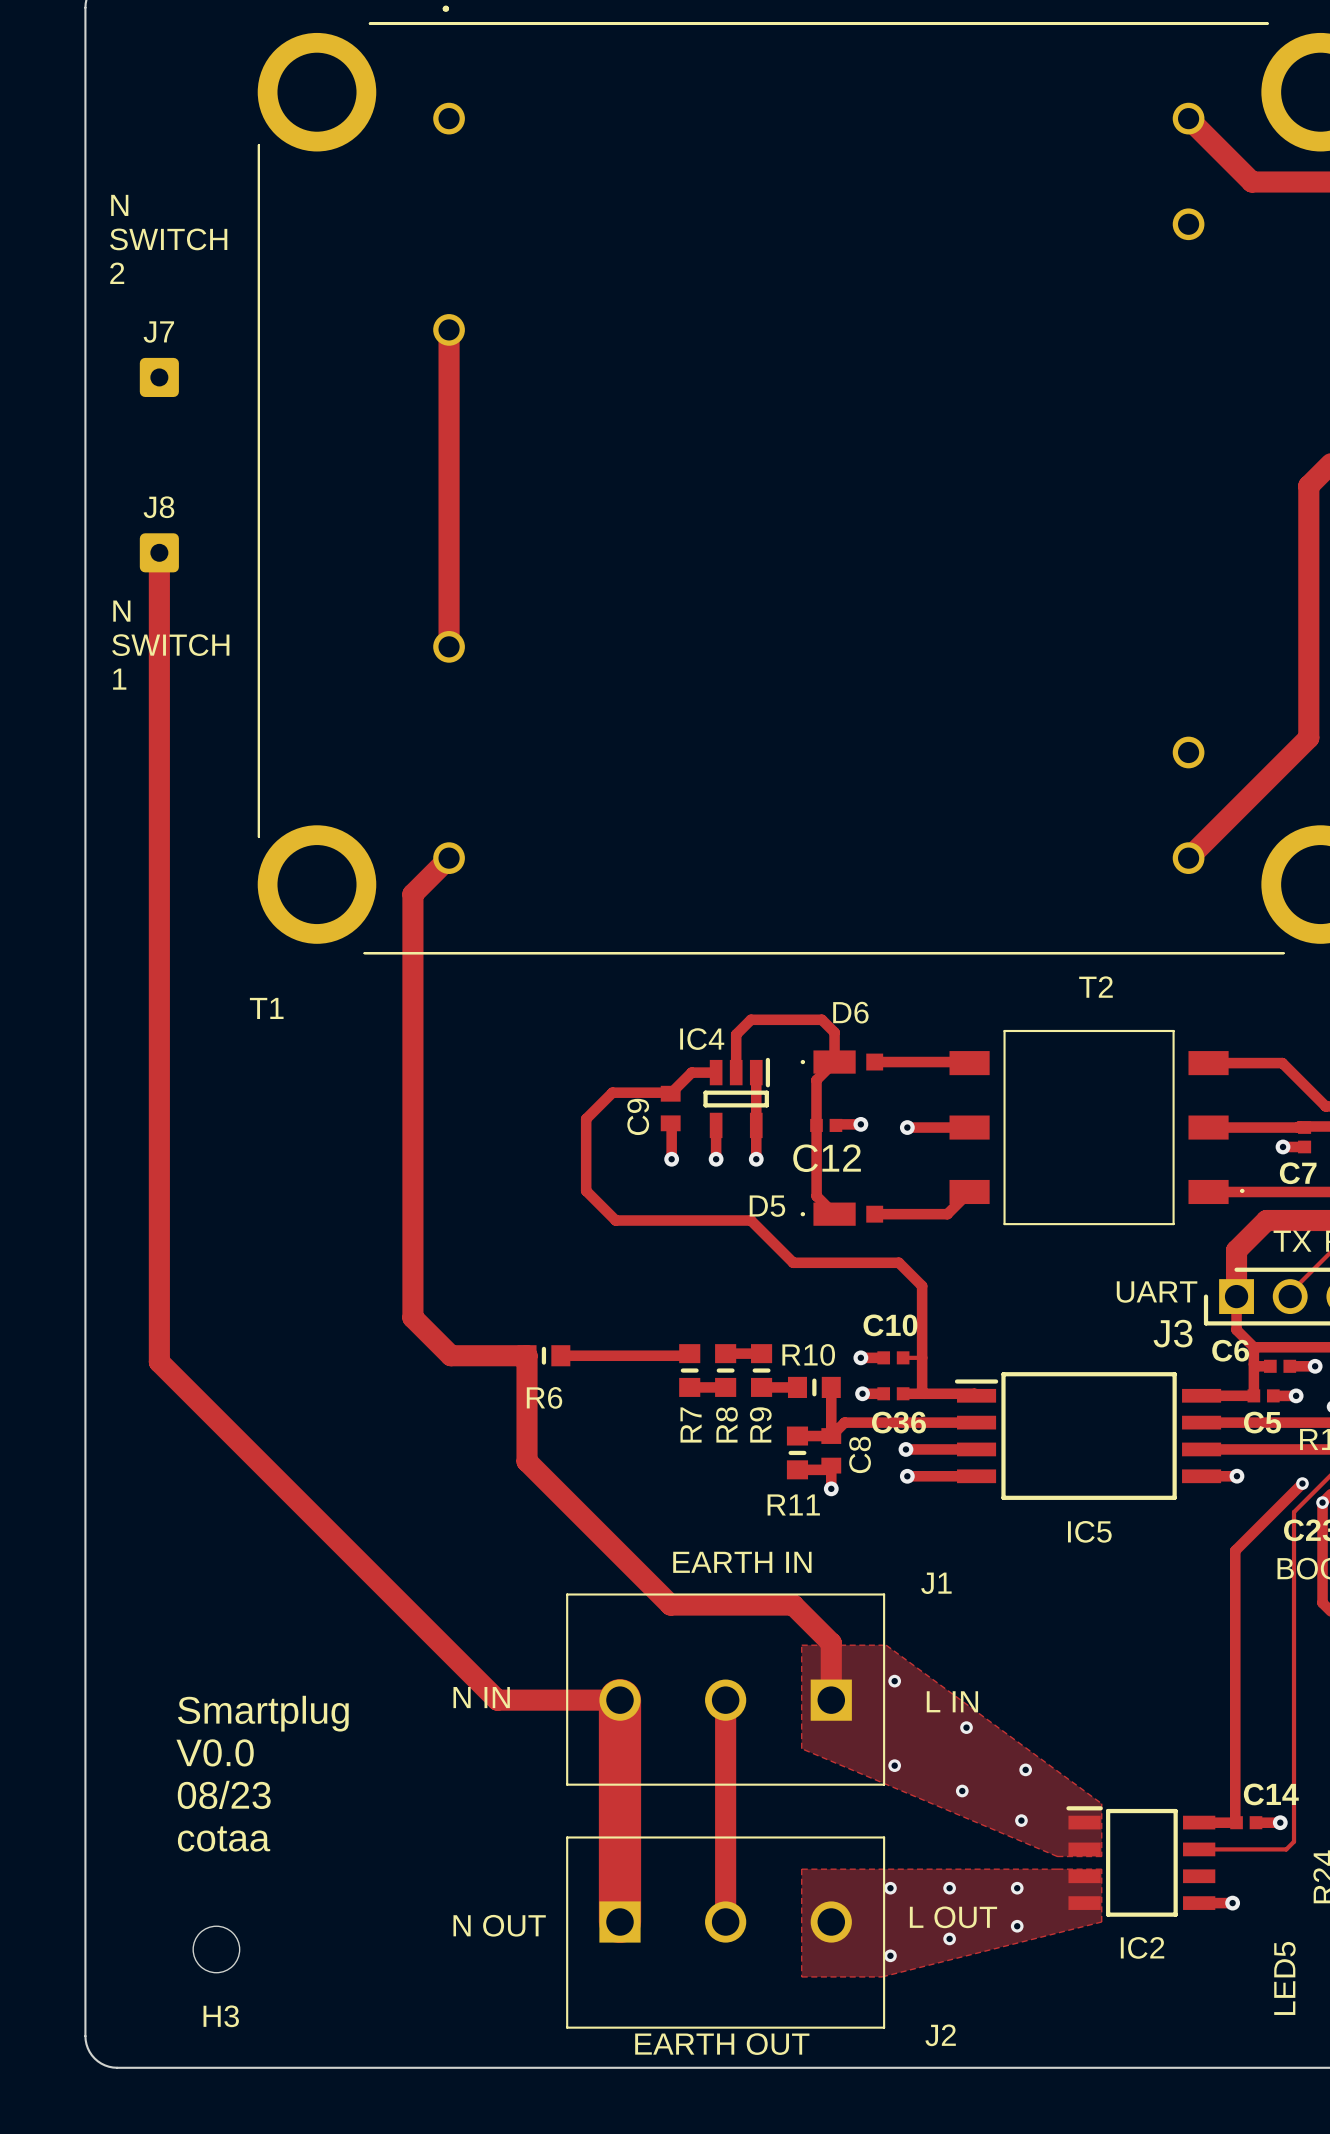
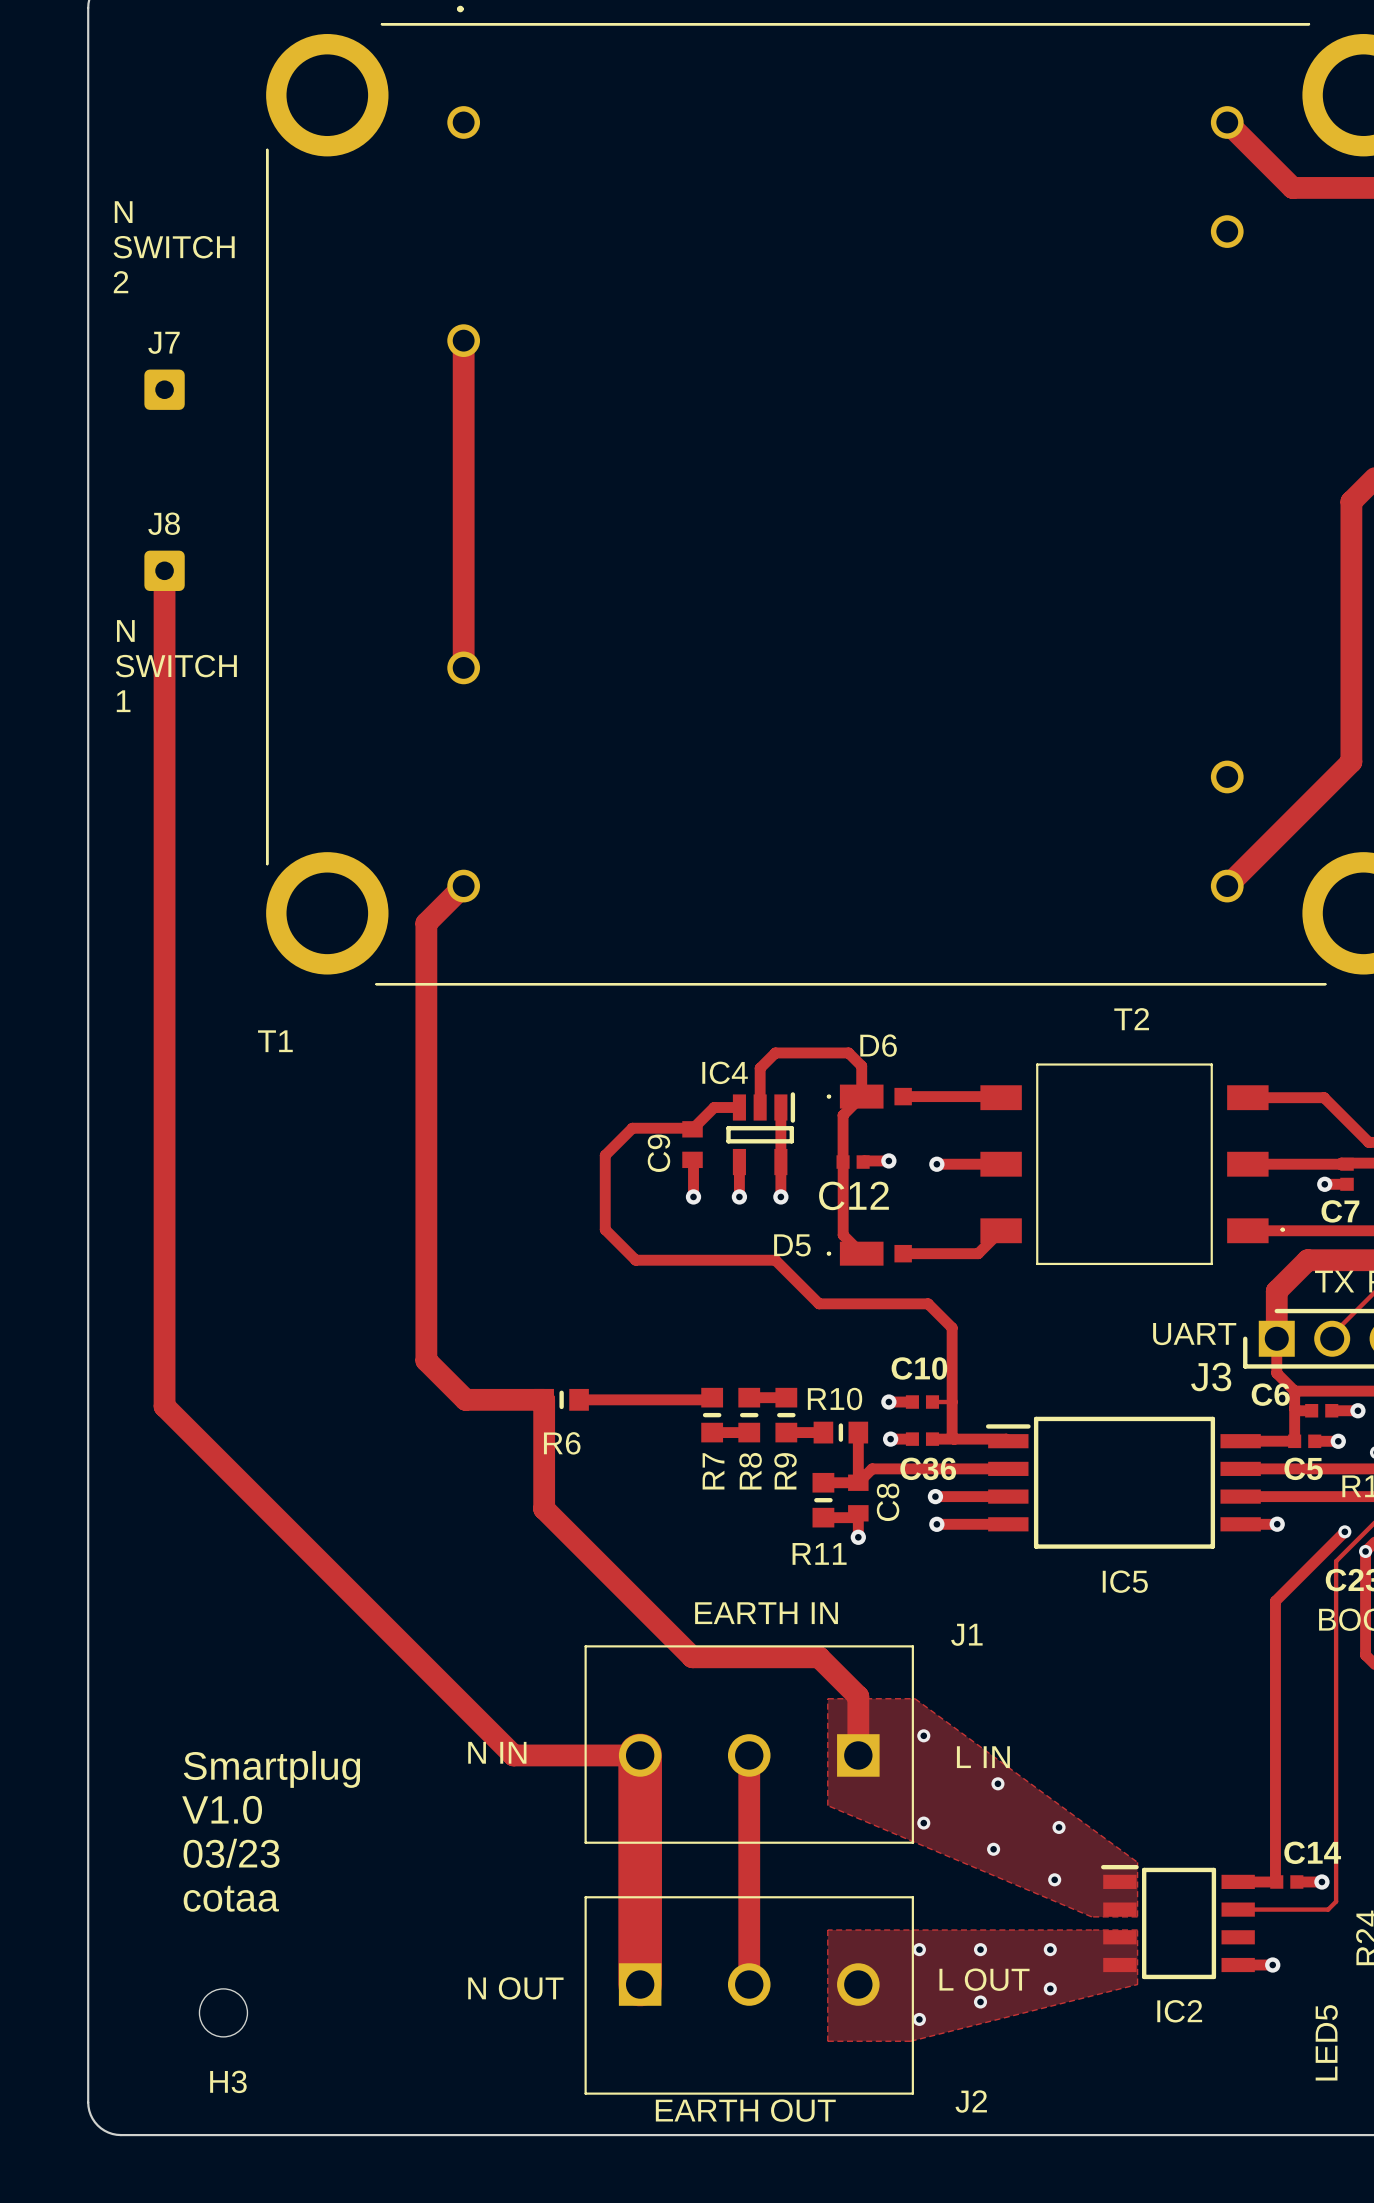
text: V0.0 (215, 1752) -> V1.0 (222, 1809)
text: 08/23 (224, 1794) -> 03/23 (231, 1853)

